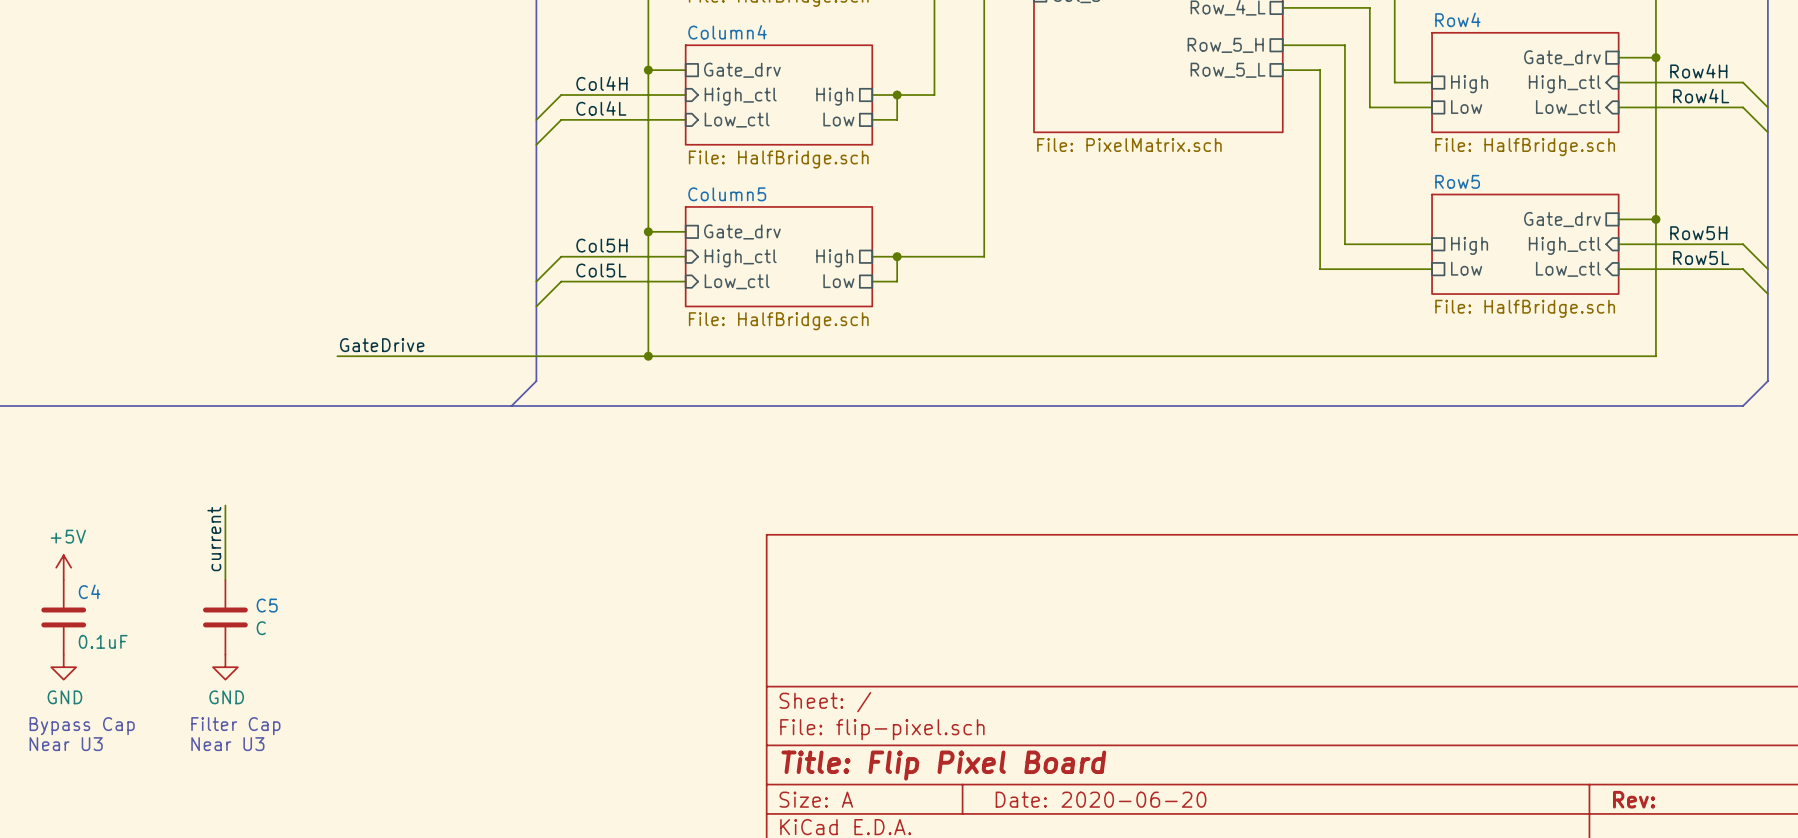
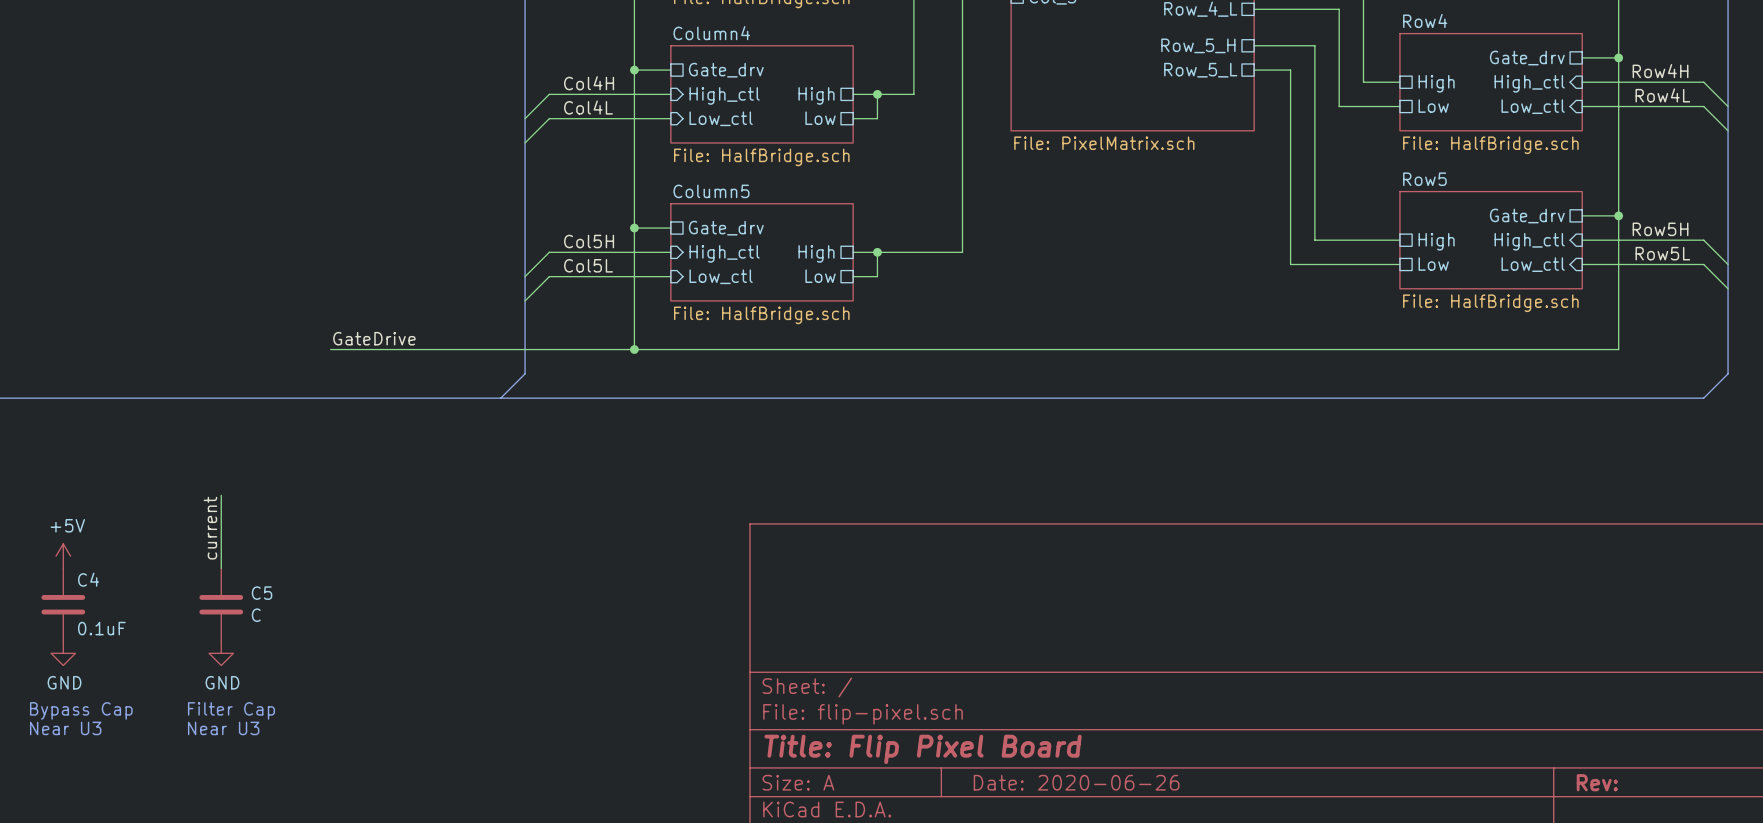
title block: Date: 2020-06-20 (1101, 799) -> Date: 2020-06-26 (1076, 782)

